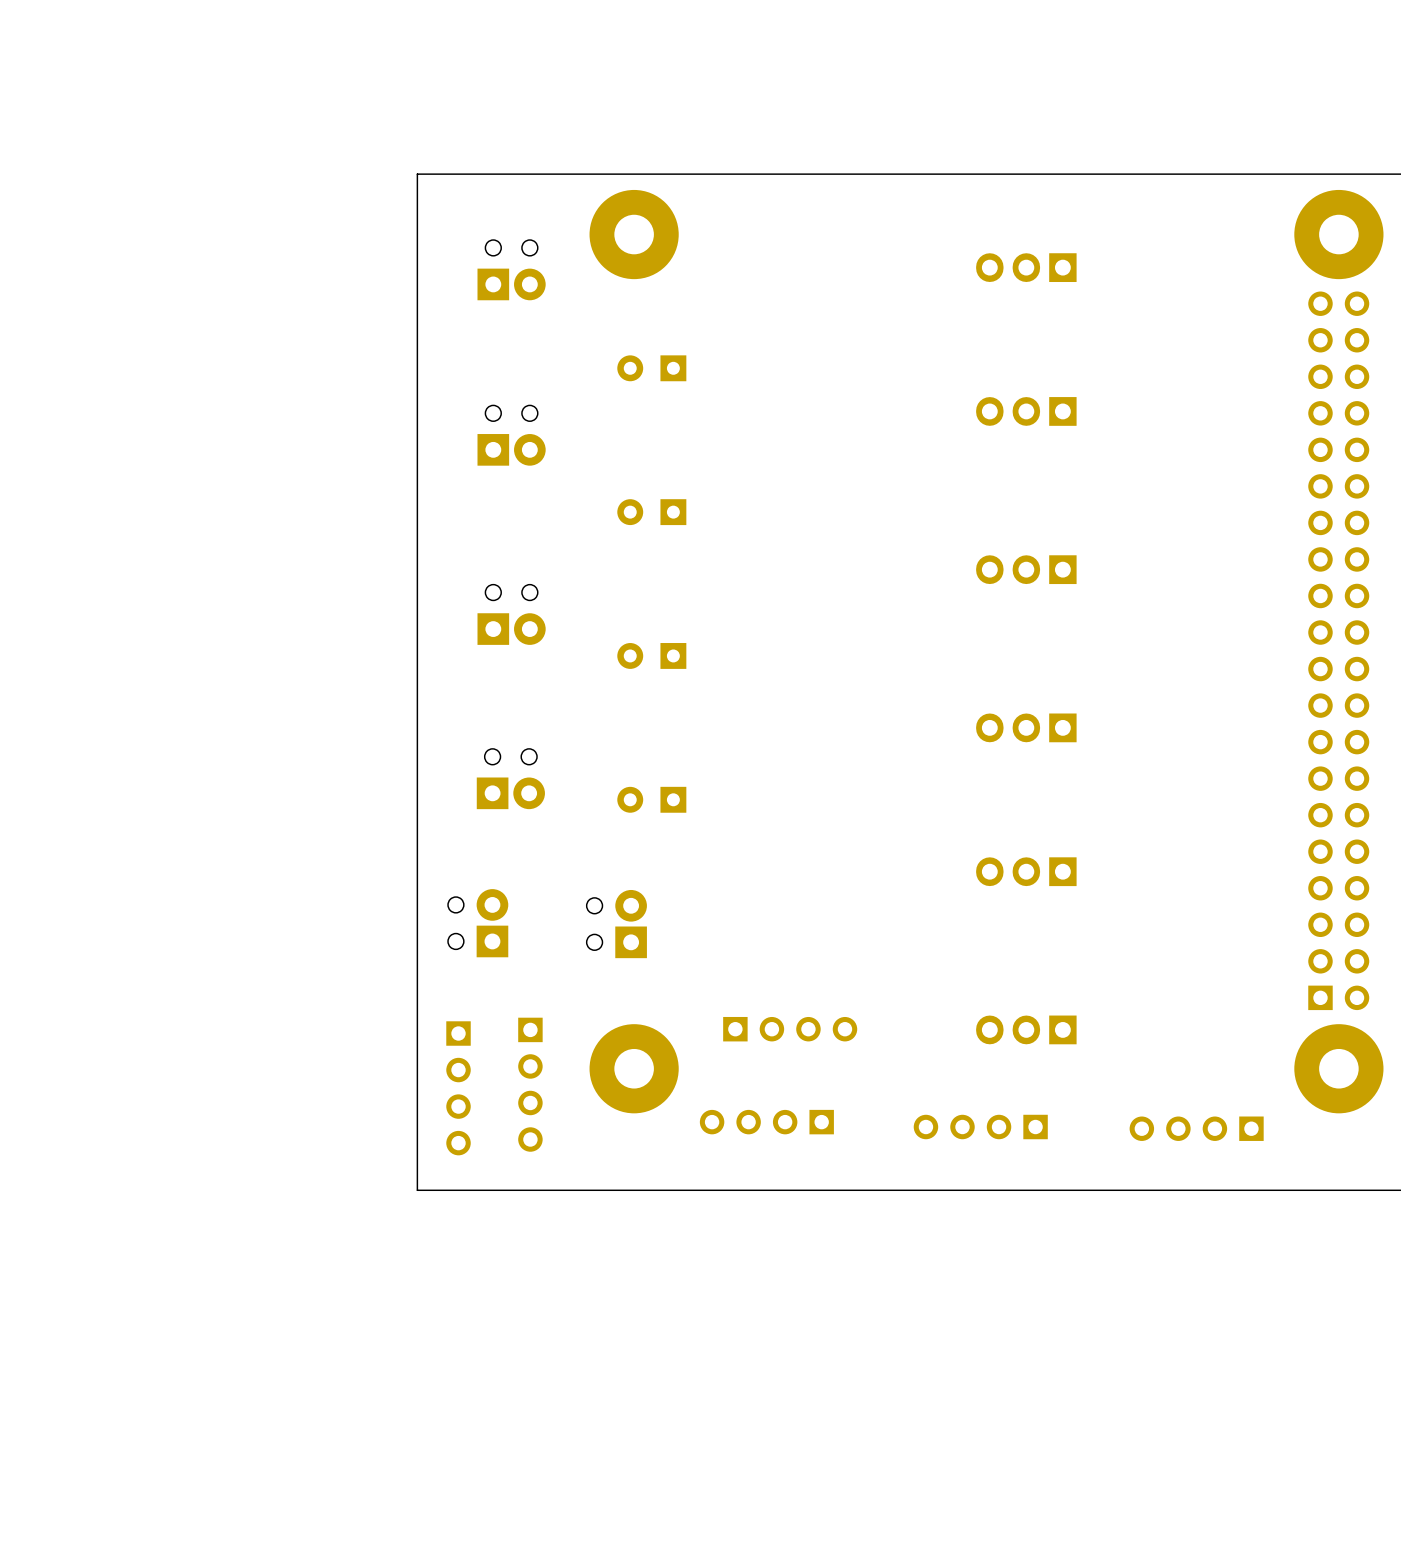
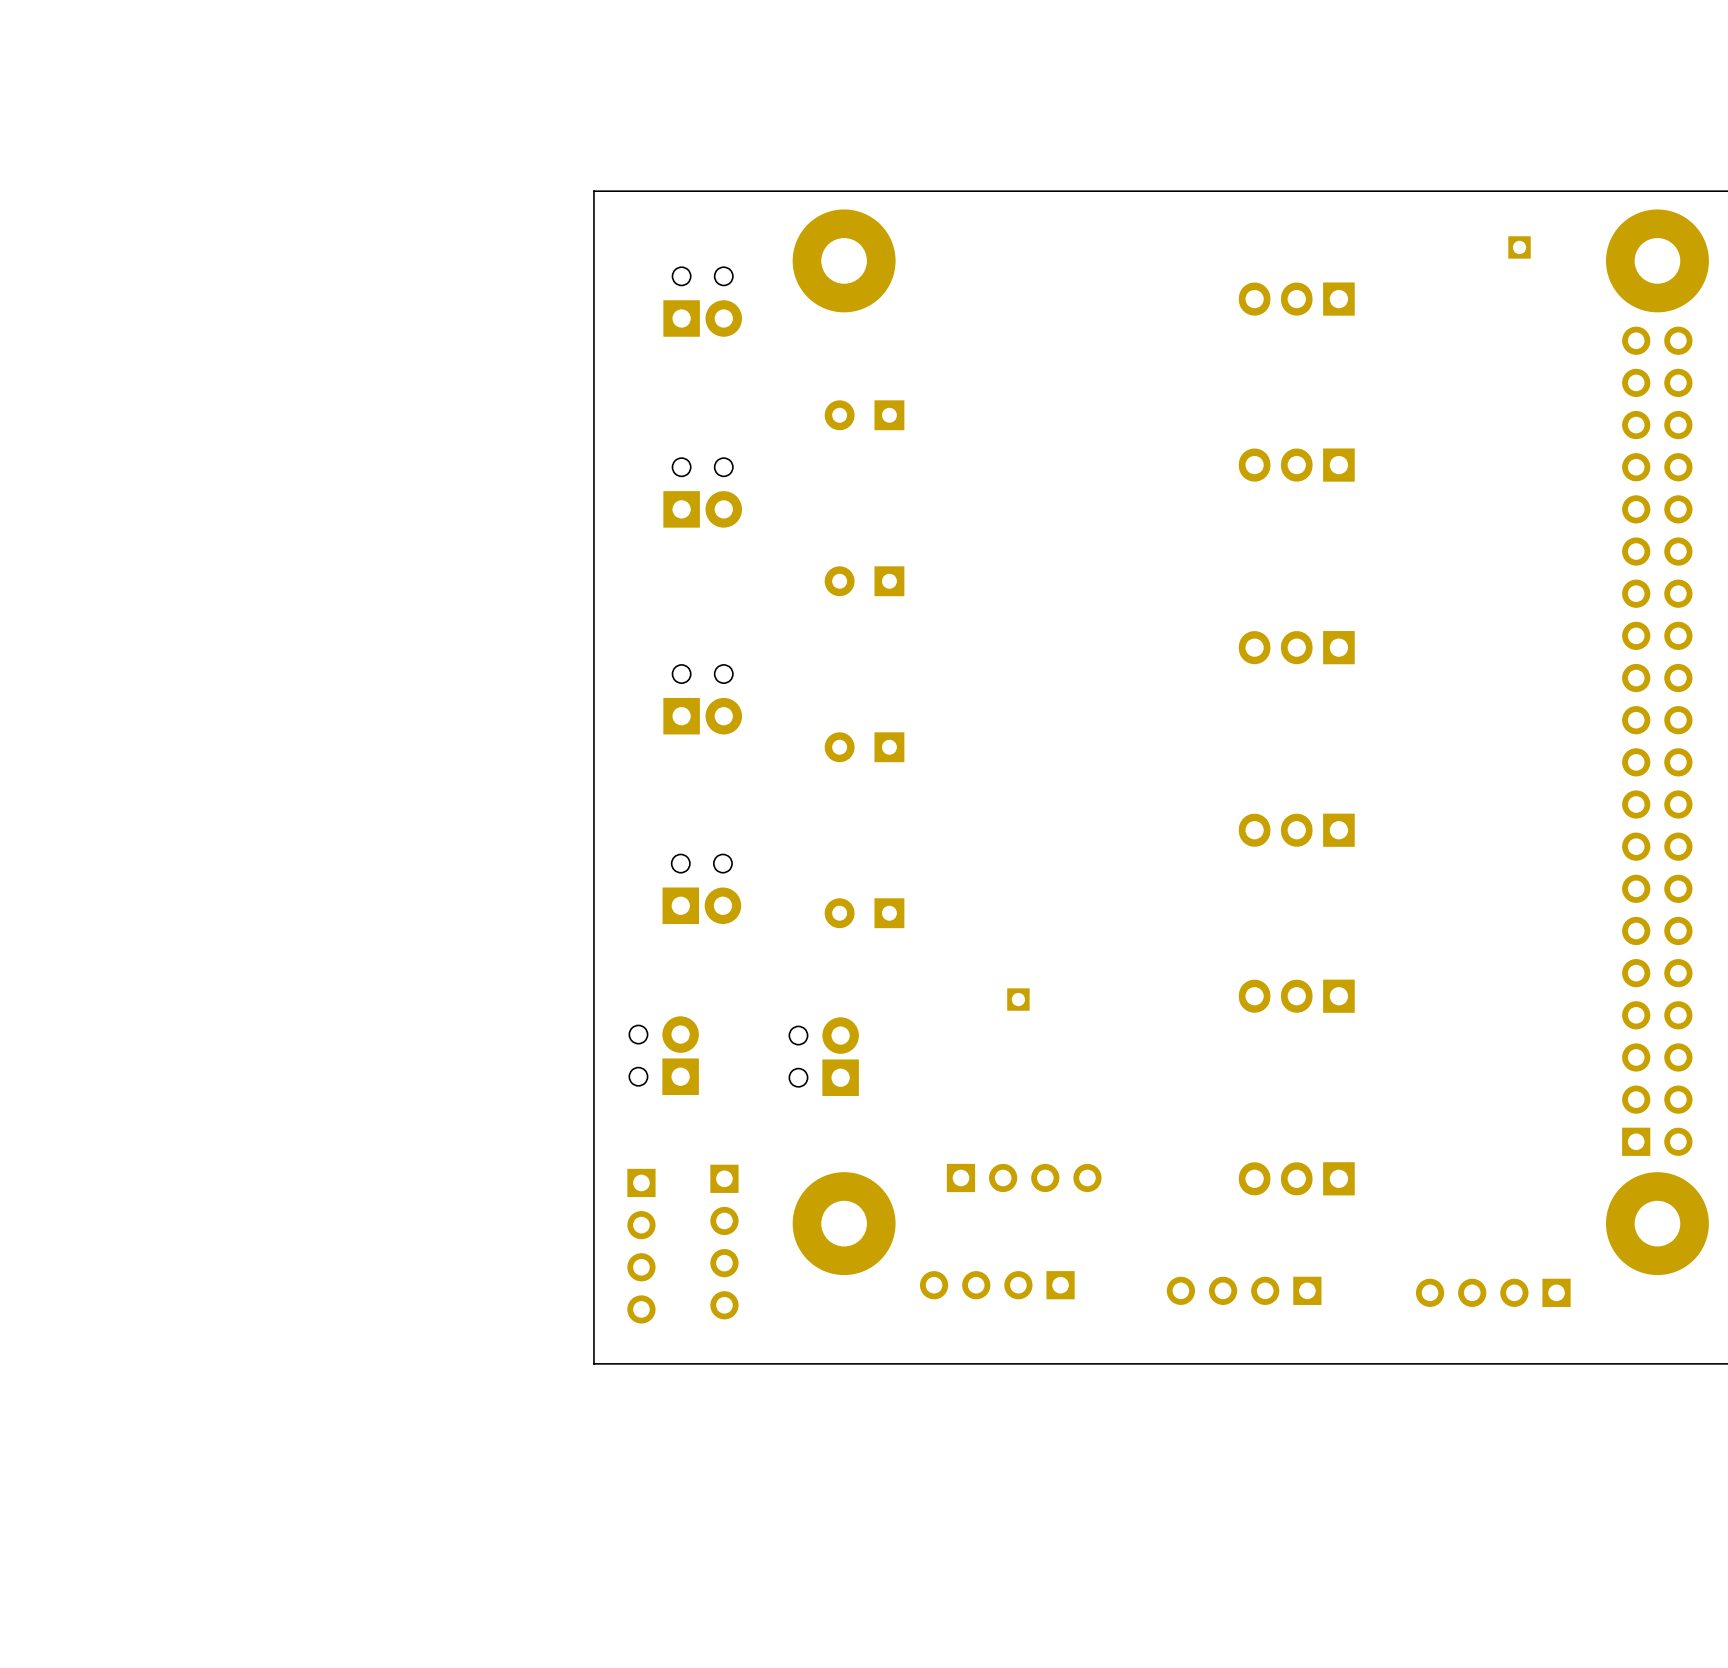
part: none -> (1519, 247)
part: none -> (1018, 999)

